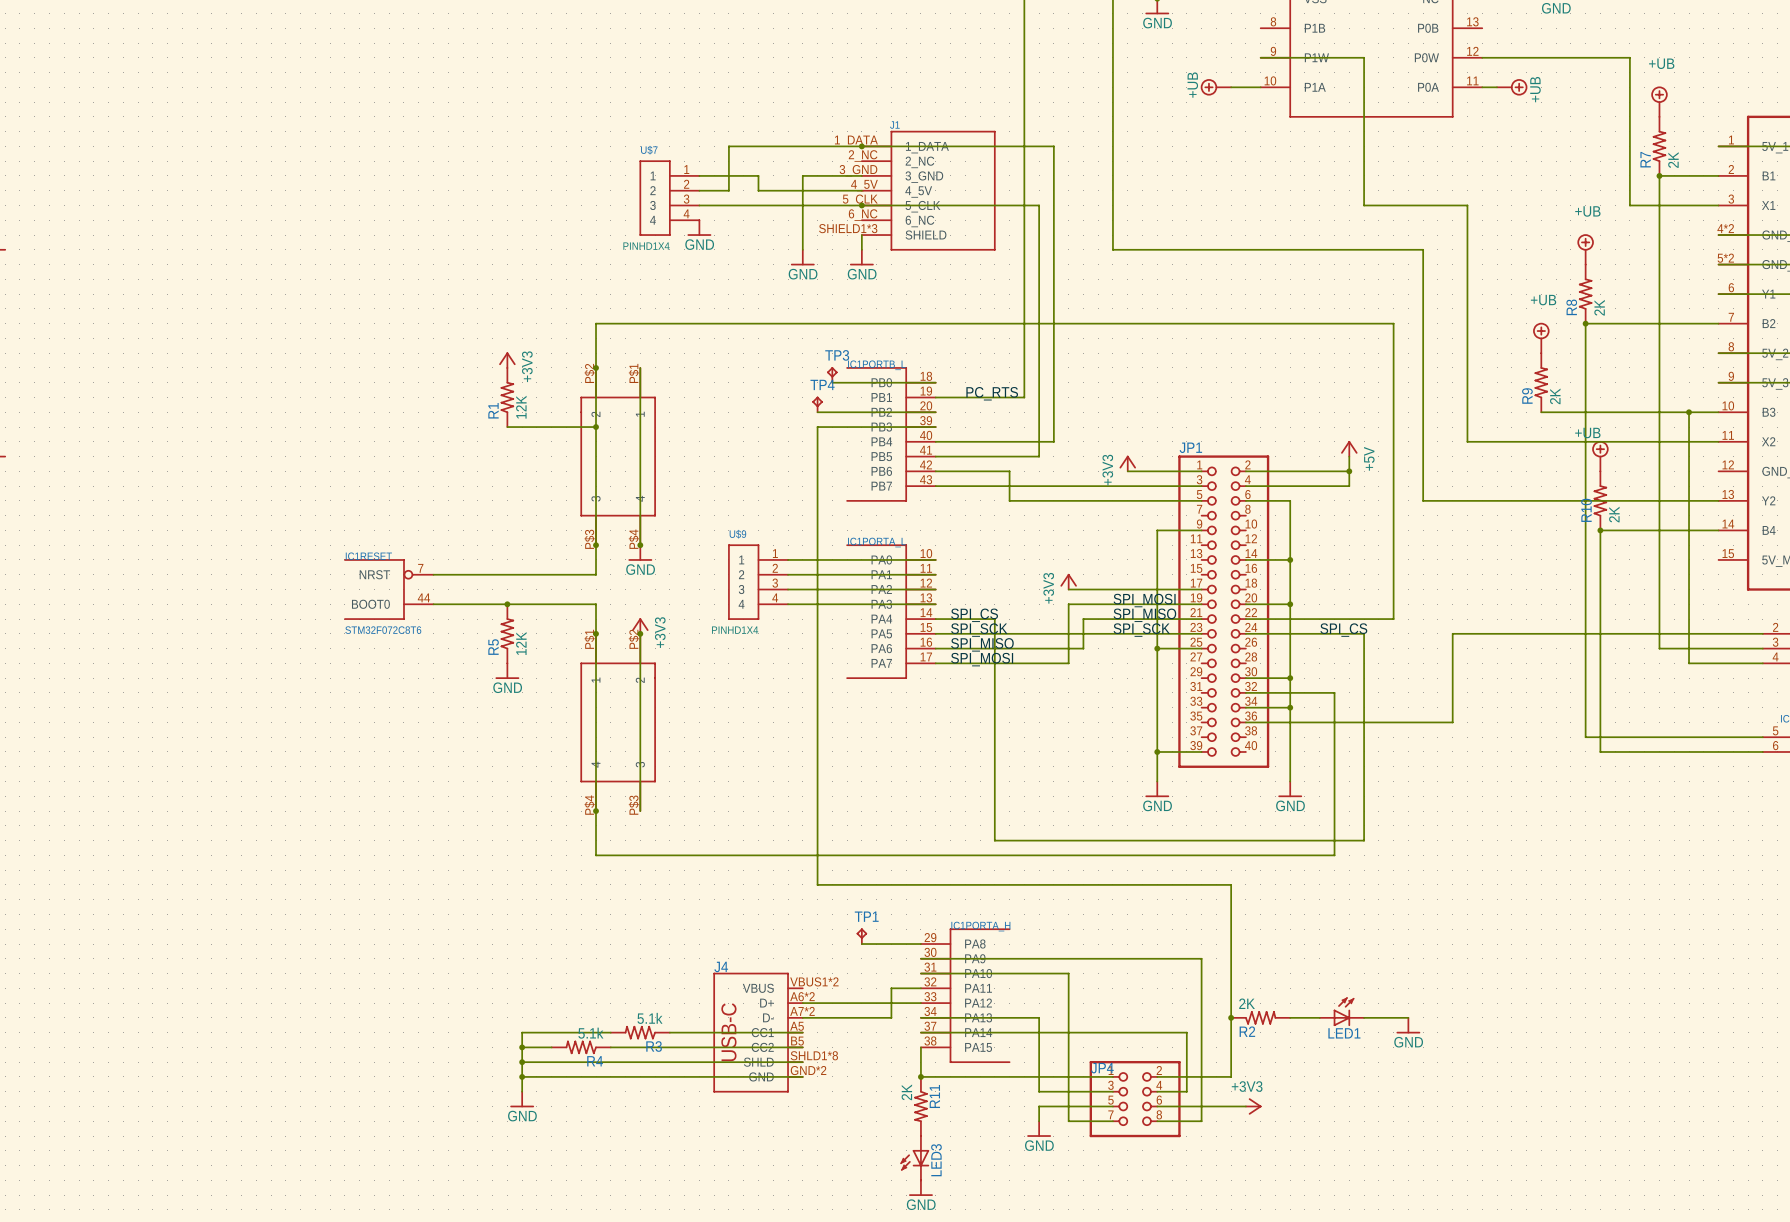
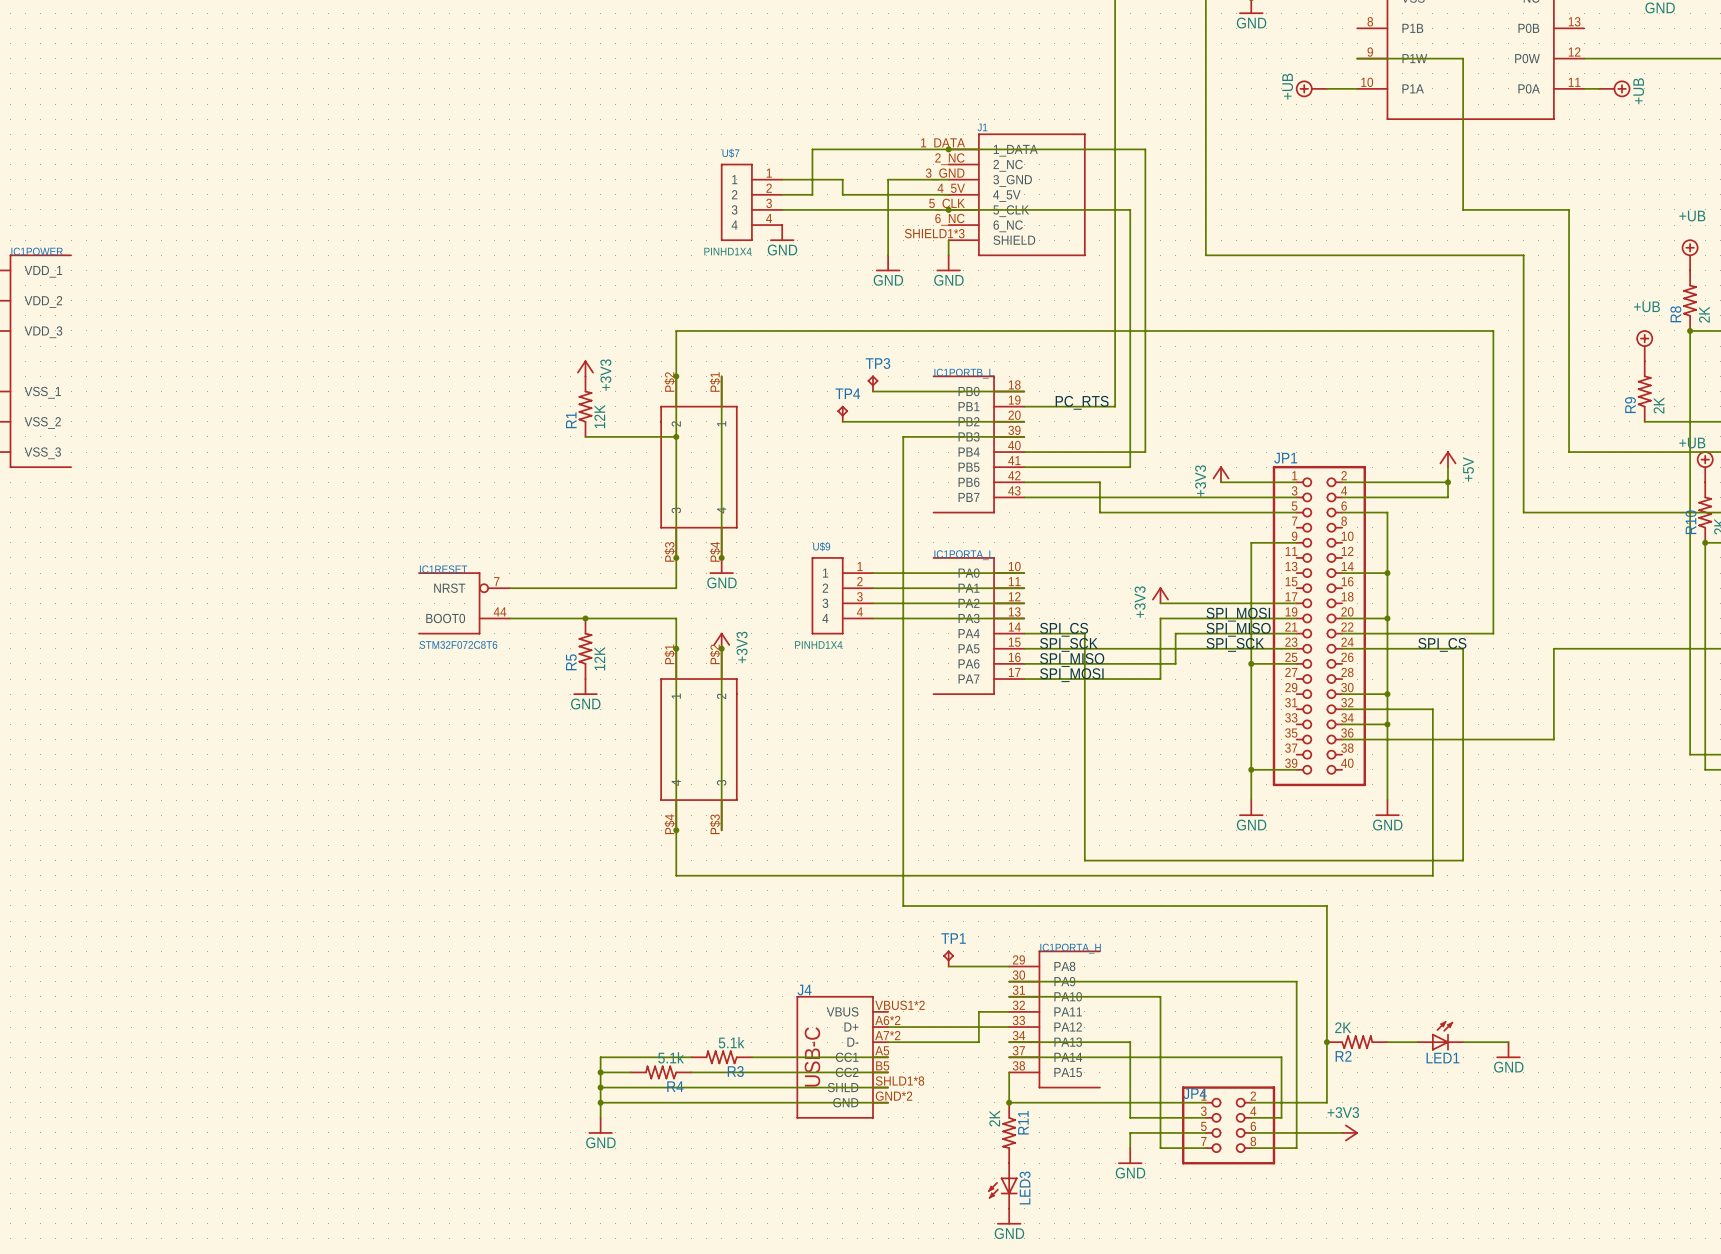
TP3 position: (832, 374) -> (872, 383)
wire: none -> (872, 391) (918, 391)
TP4 position: (817, 404) -> (842, 413)
wire: none -> (842, 421) (903, 421)

